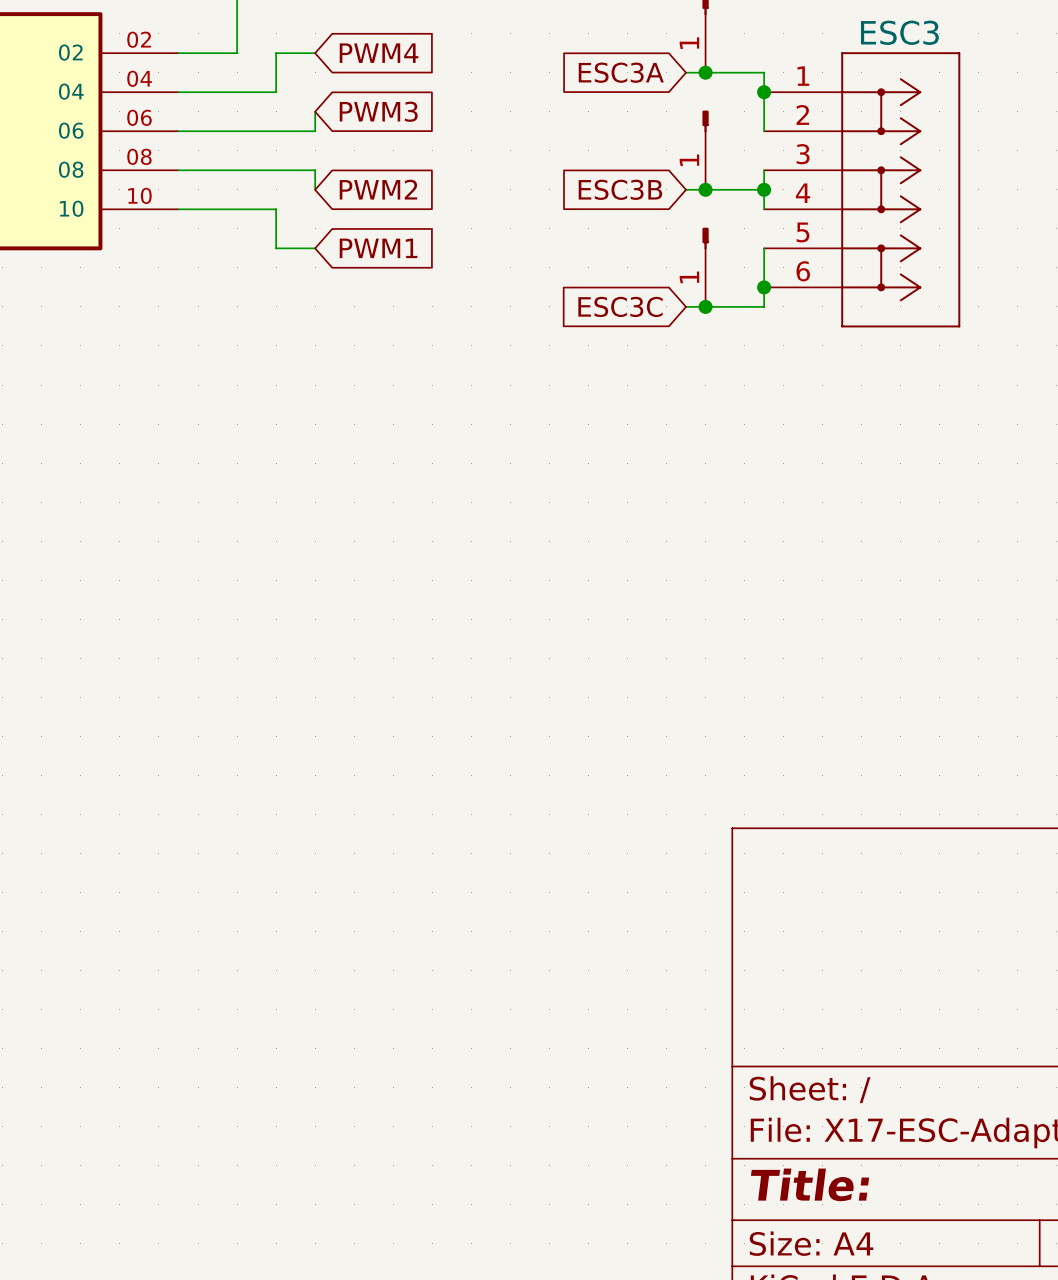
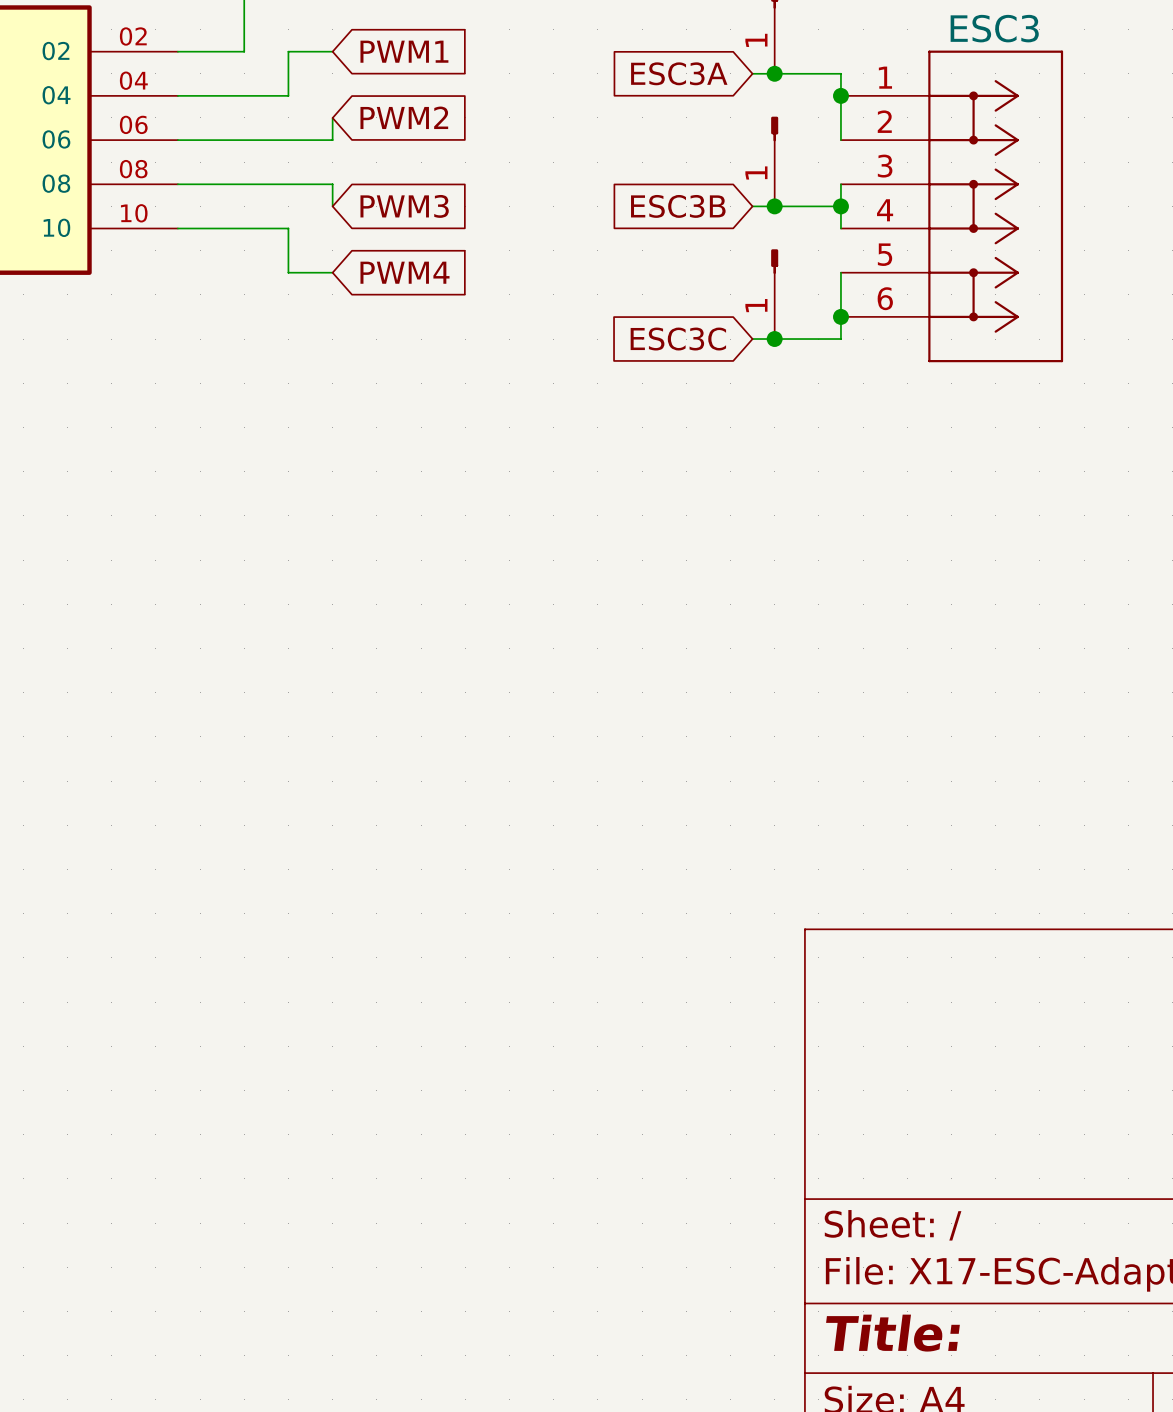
global label: PWM4 (379, 53) -> PWM1 (404, 51)
global label: PWM3 (378, 111) -> PWM2 (404, 117)
global label: PWM2 (378, 189) -> PWM3 (404, 206)
global label: PWM1 (378, 248) -> PWM4 (404, 272)

